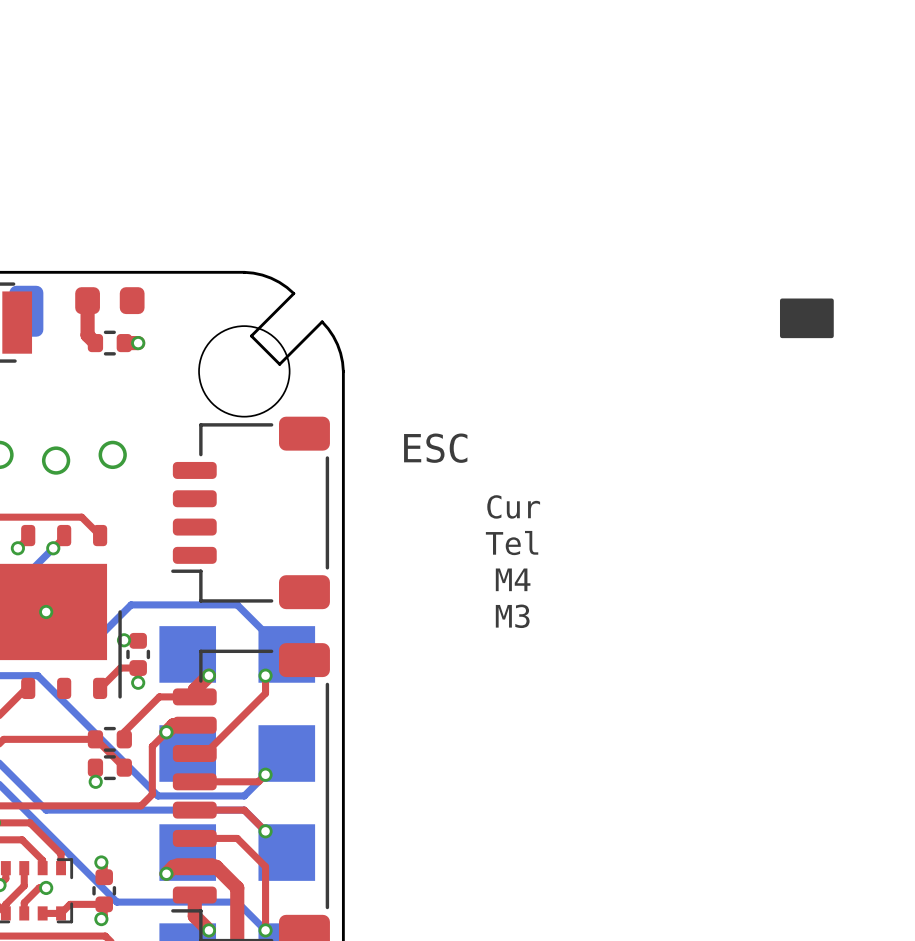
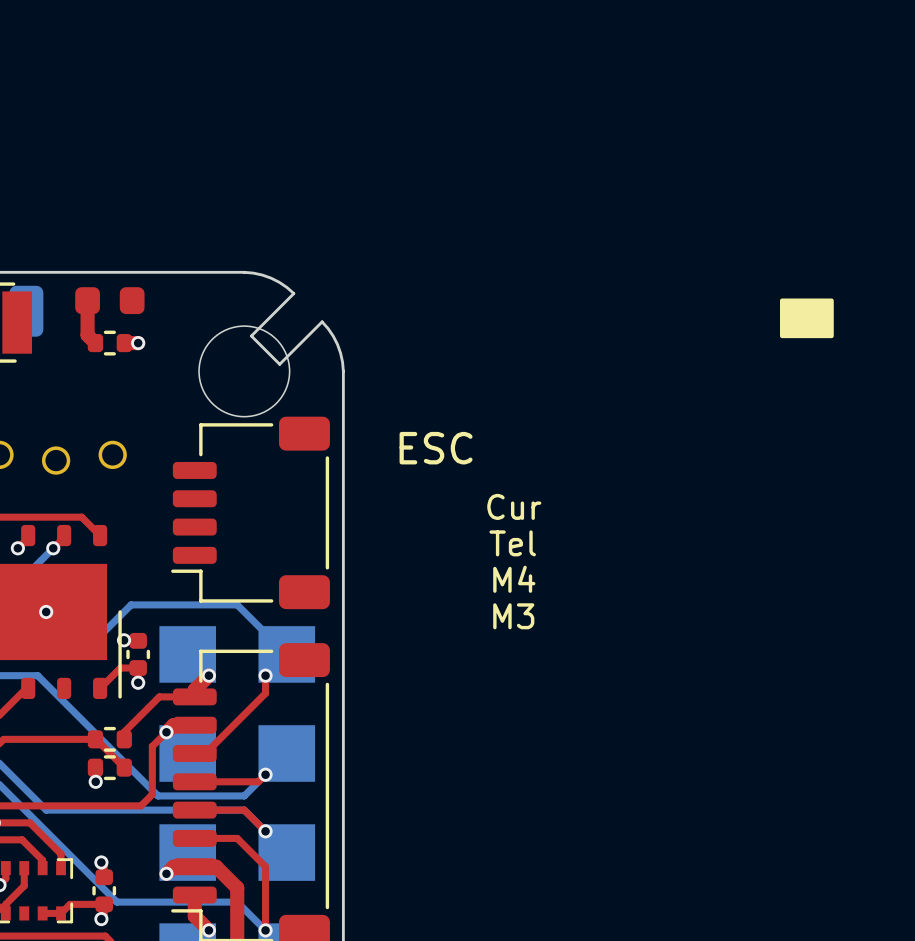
top track: (46, 887) (39, 887) (24, 902) (24, 913) -> none
via: (46, 887) -> none

